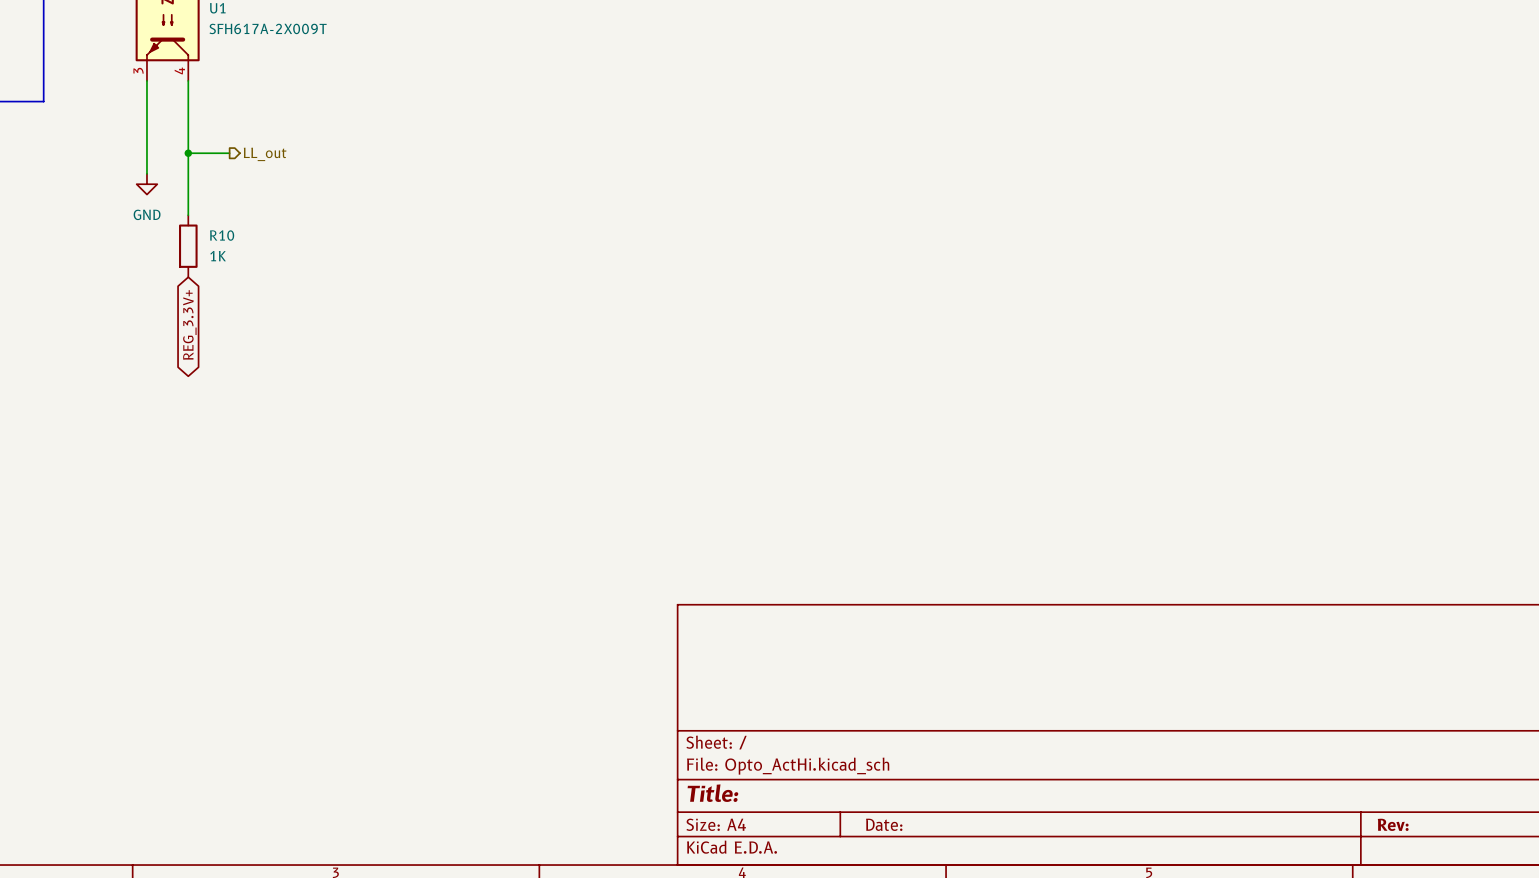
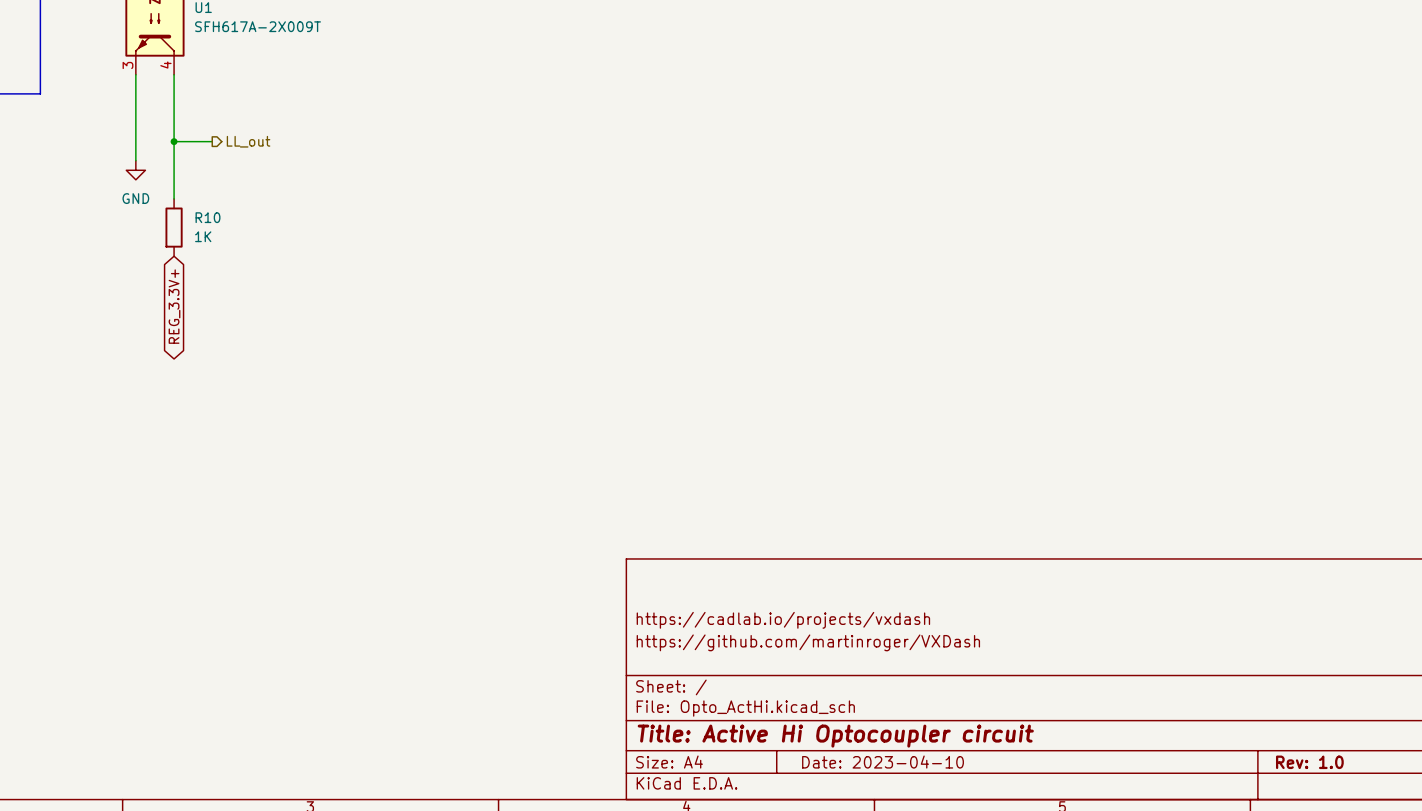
title block: none -> https://cadlab.io/projects/vxdash (783, 620)
title block: none -> https://github.com/martinroger/VXDash (808, 642)
title block: Title: (712, 793) -> Title: Active Hi Optocoupler circuit (835, 736)
title block: Date: (884, 824) -> Date: 2023-04-10 (883, 762)
title block: Rev: (1393, 824) -> Rev: 1.0 (1309, 762)

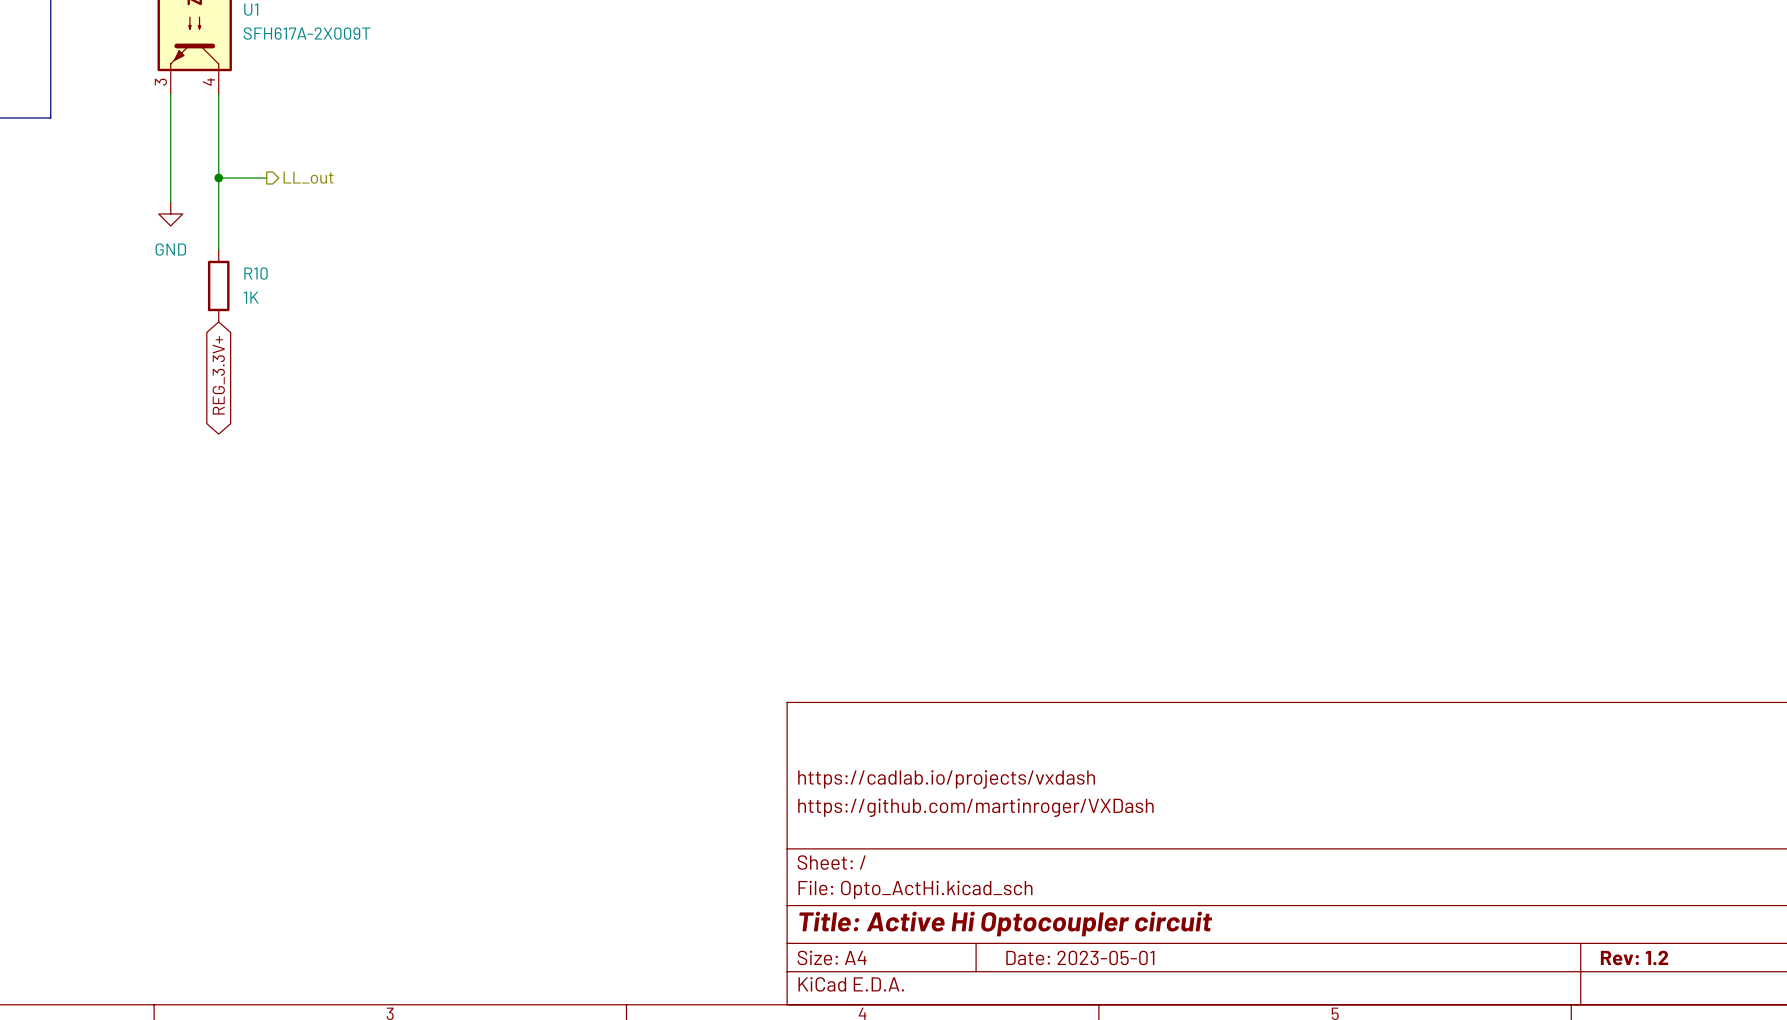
title block: Date: 2023-04-10 (883, 762) -> Date: 2023-05-01 (1080, 957)
title block: Rev: 1.0 (1309, 762) -> Rev: 1.2 (1634, 957)

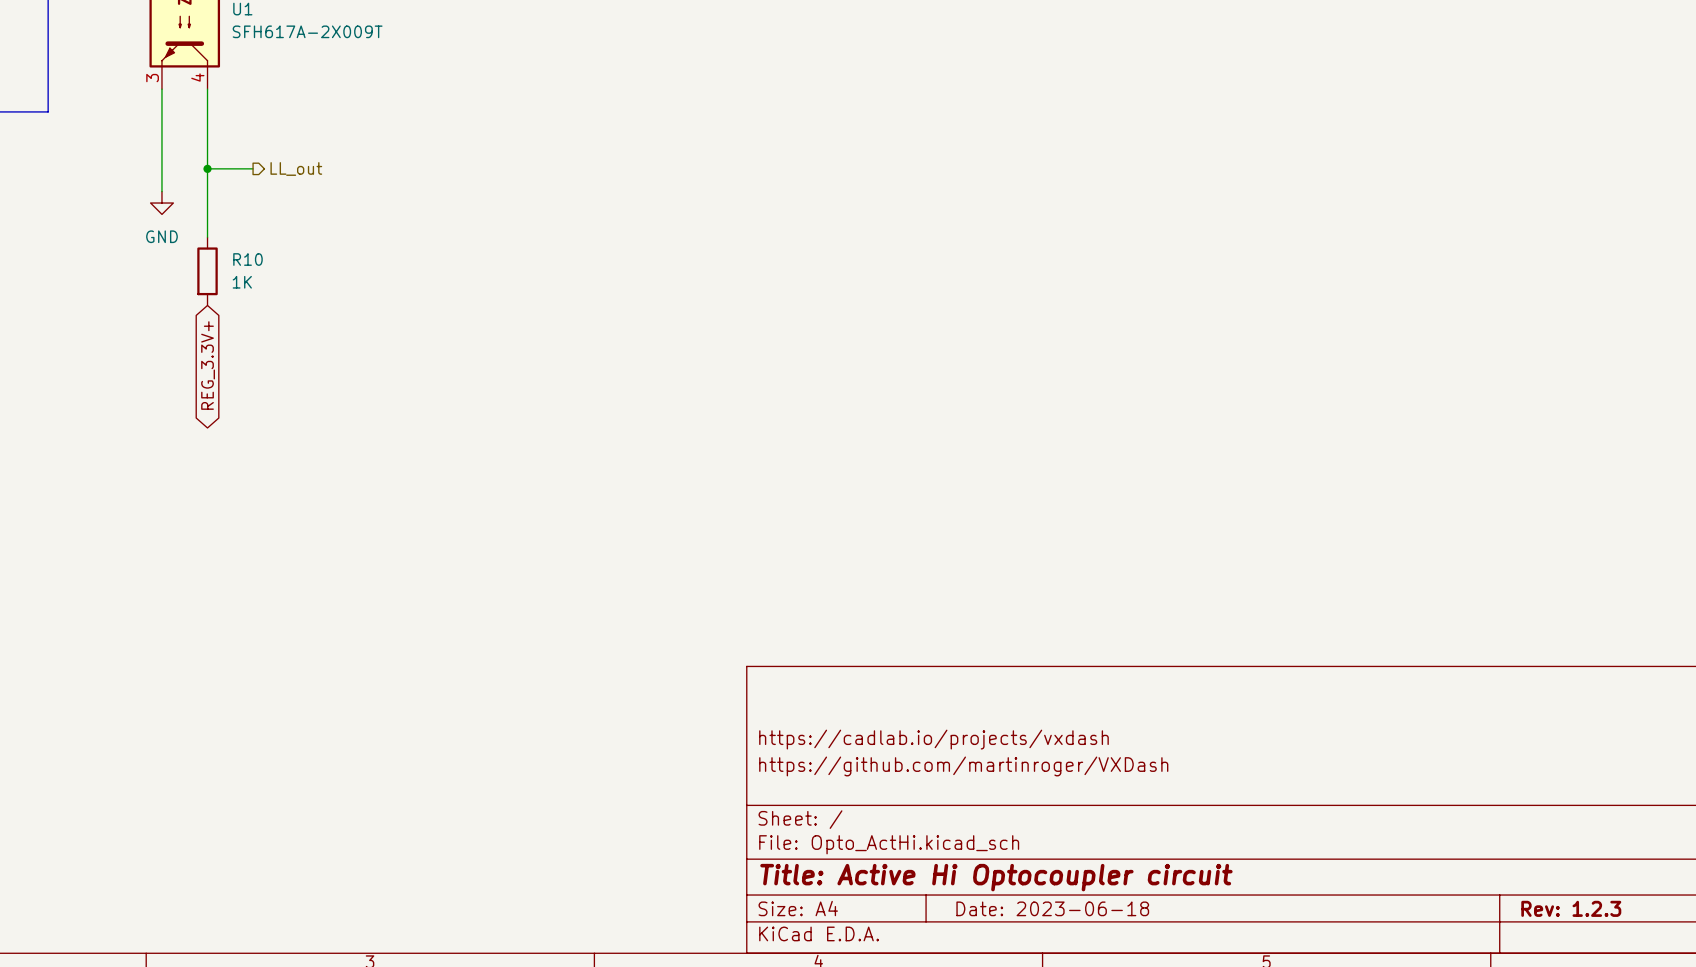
title block: Date: 2023-05-01 (1080, 957) -> Date: 2023-06-18 (1052, 908)
title block: Rev: 1.2 (1634, 957) -> Rev: 1.2.3 (1571, 908)

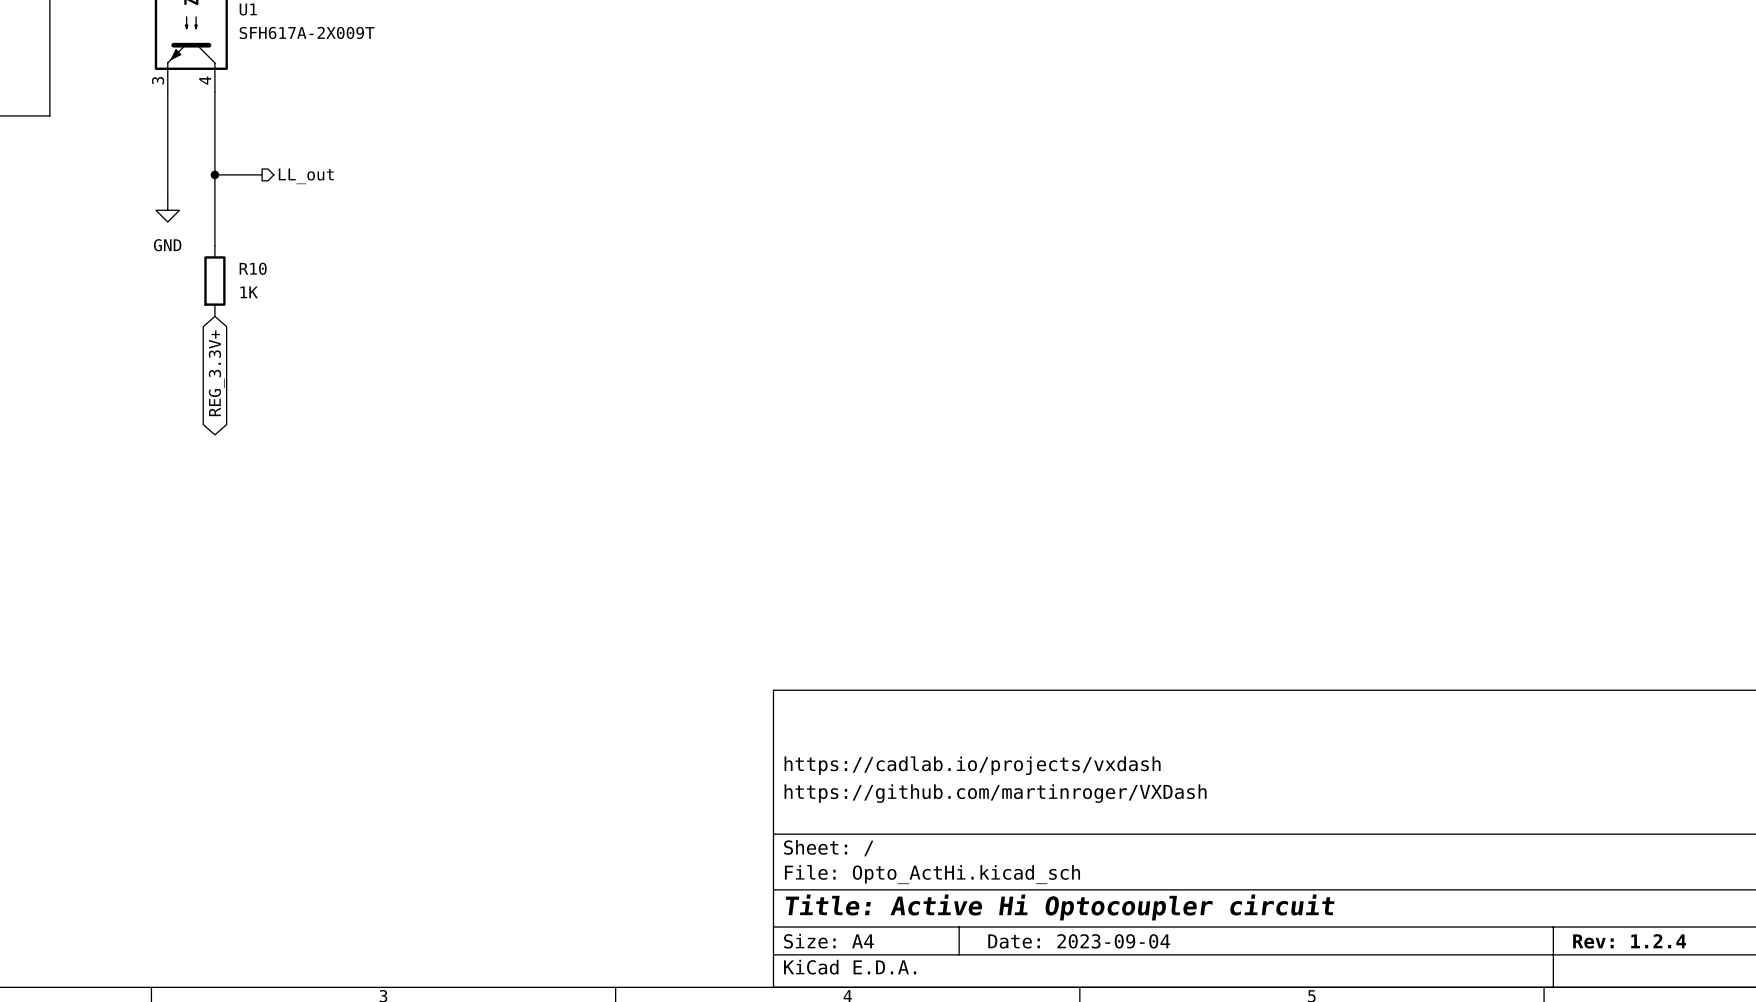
title block: Date: 2023-06-18 (1052, 908) -> Date: 2023-09-04 (1079, 941)
title block: Rev: 1.2.3 (1571, 908) -> Rev: 1.2.4 (1629, 941)

